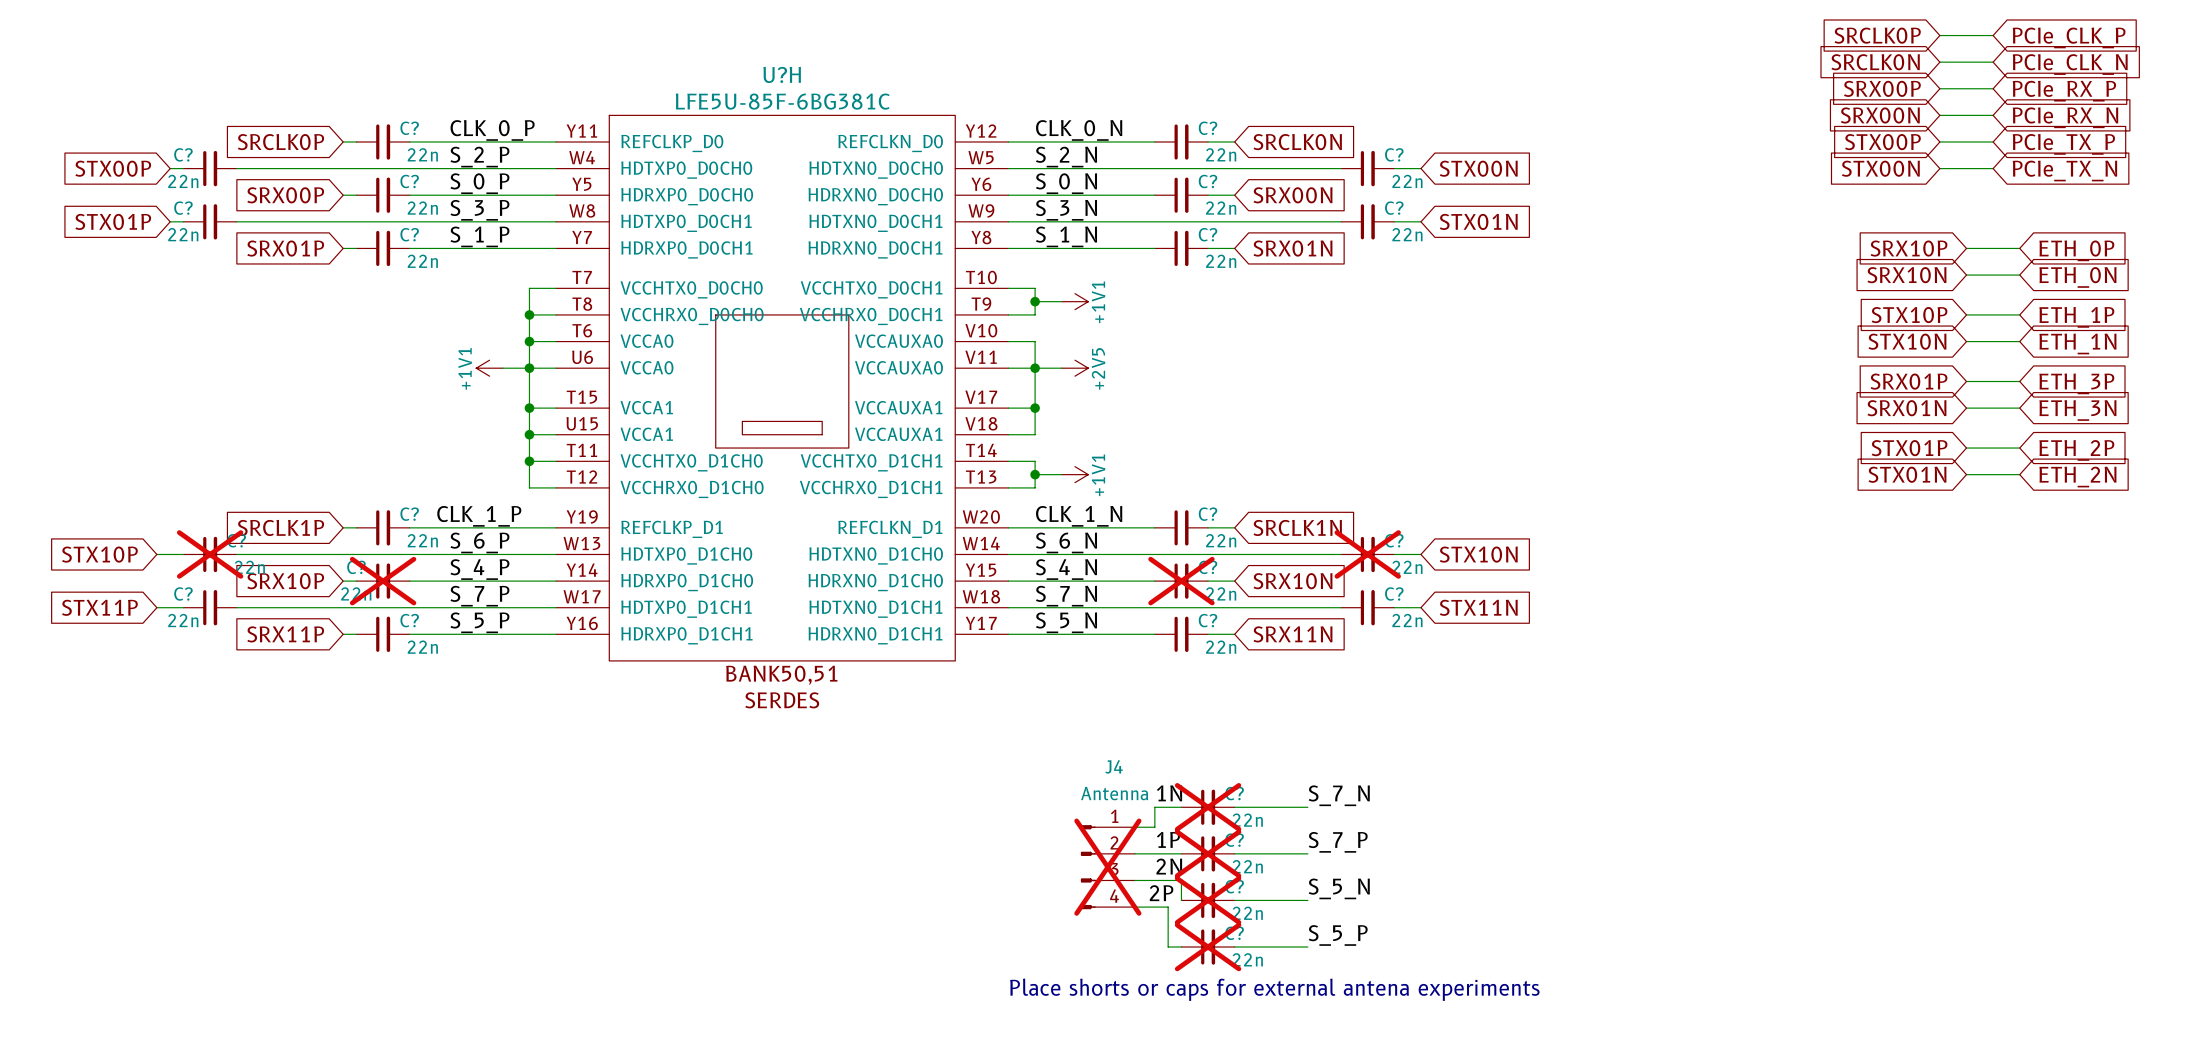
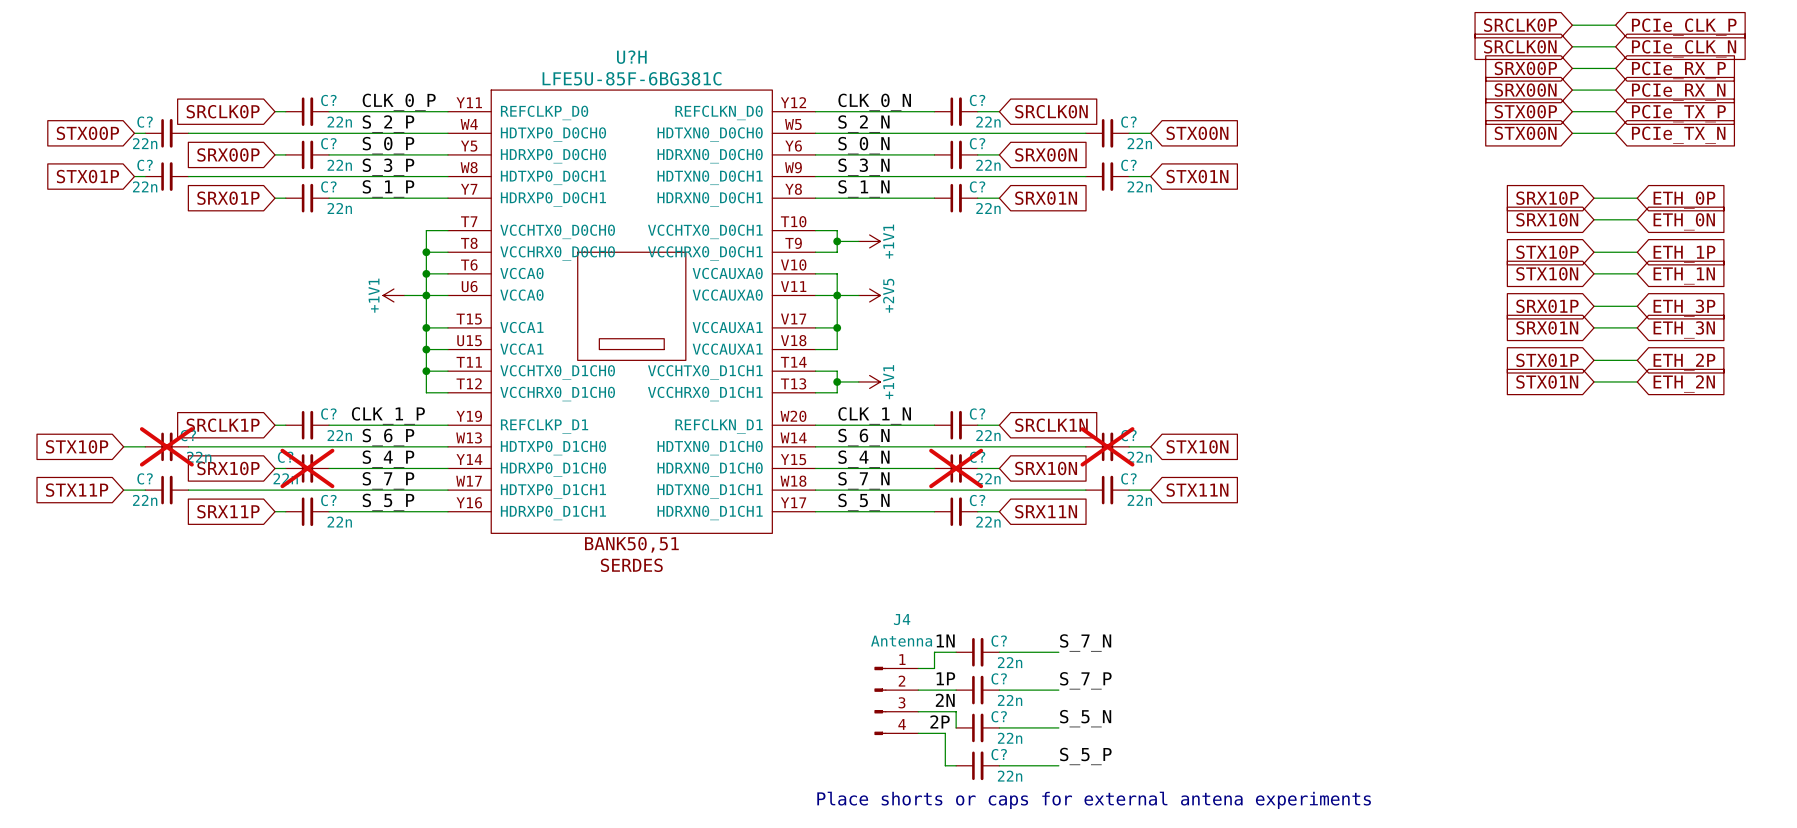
C? do-not-place cross: (1208, 807) -> none
C? do-not-place cross: (1208, 853) -> none
J4 do-not-place cross: (1107, 867) -> none
C? do-not-place cross: (1208, 900) -> none
C? do-not-place cross: (1208, 947) -> none

